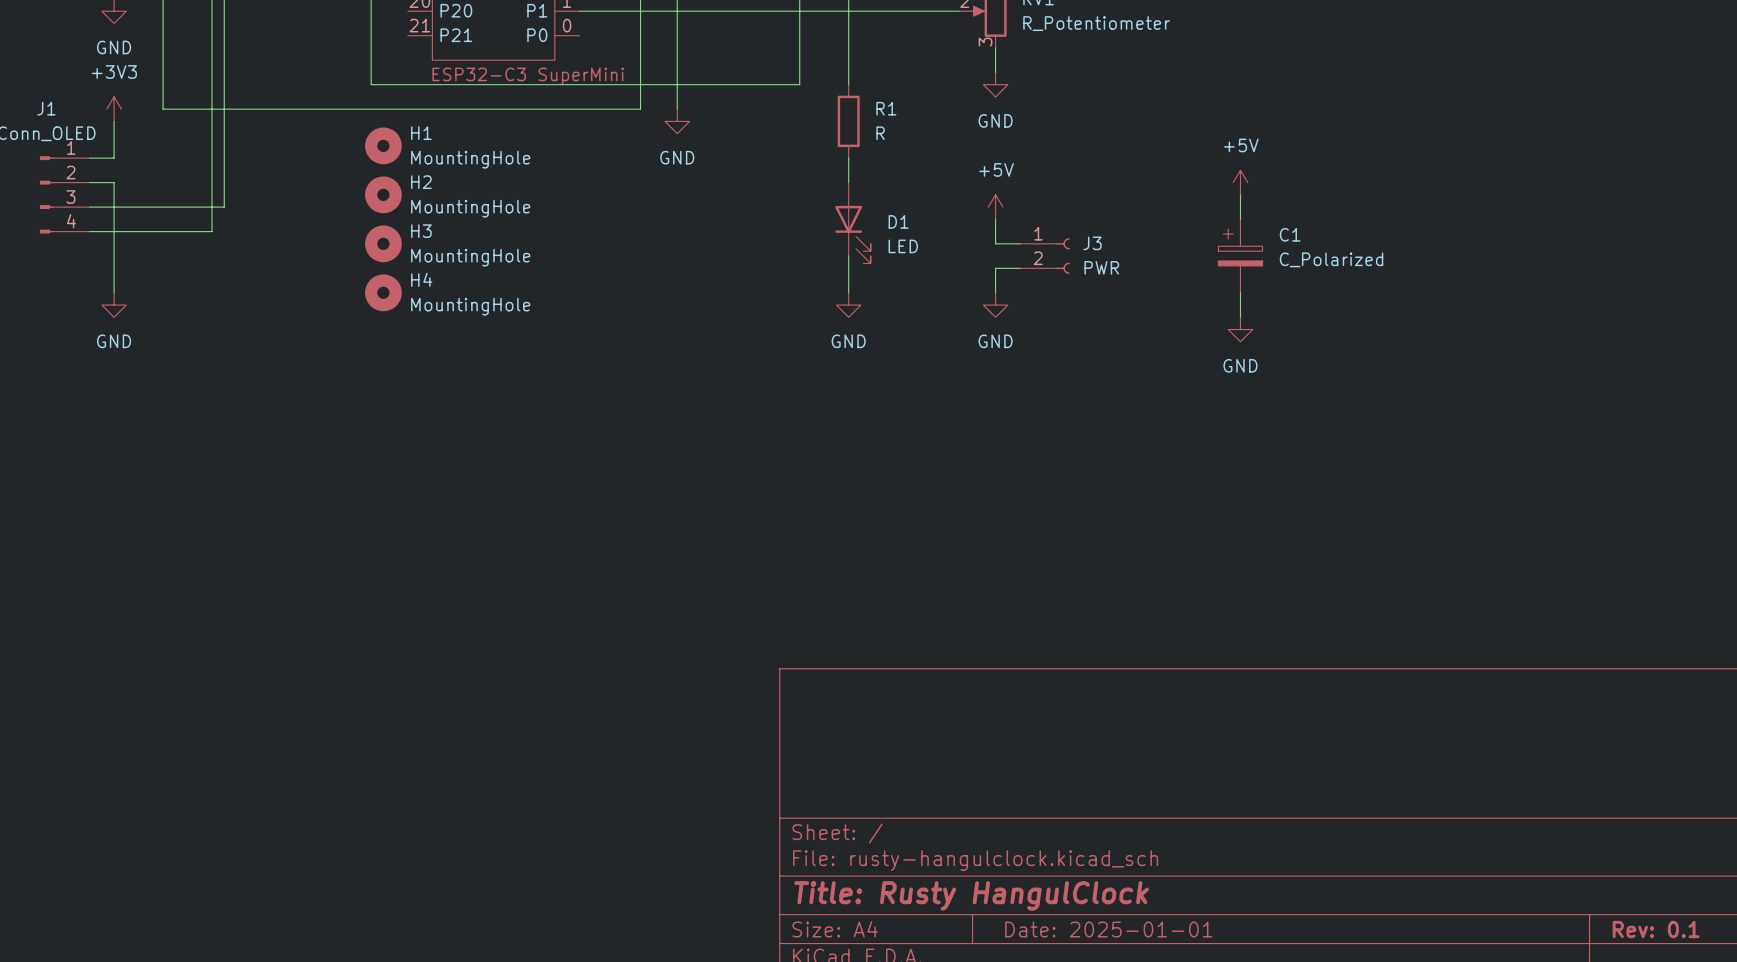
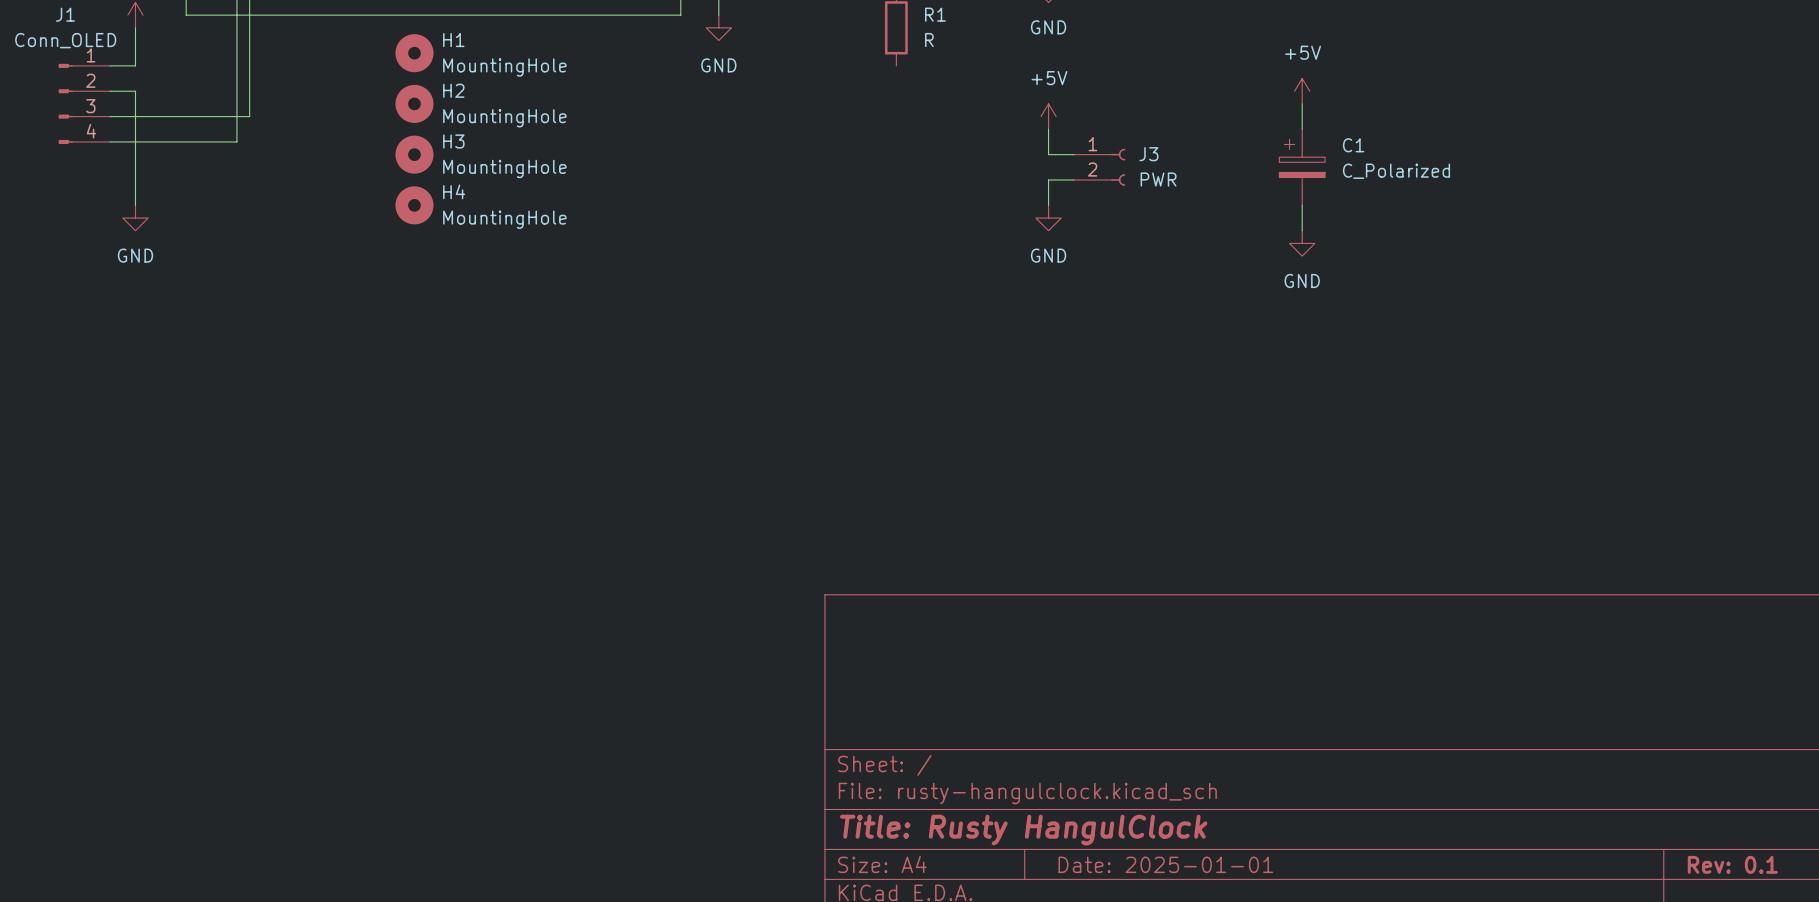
wire: (848, 158) (848, 182) -> none
D1: LED (852, 223) -> none
wire: (848, 256) (848, 292) -> none
power symbol: GND (848, 305) -> none

